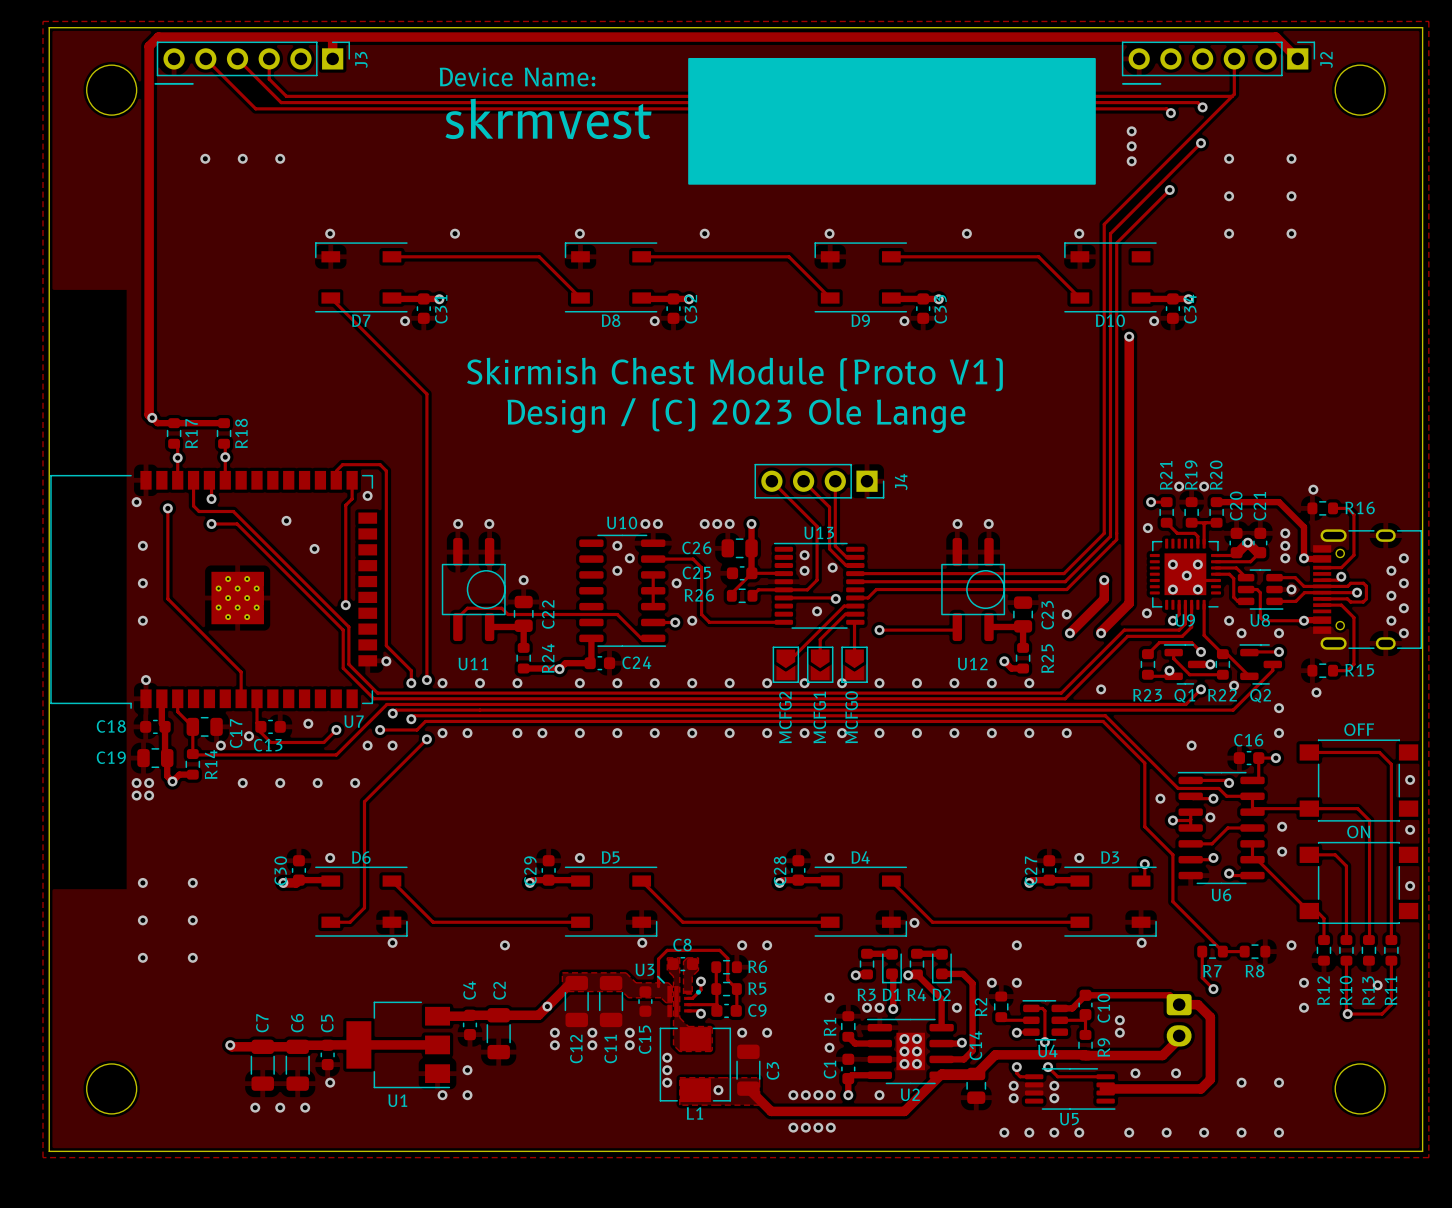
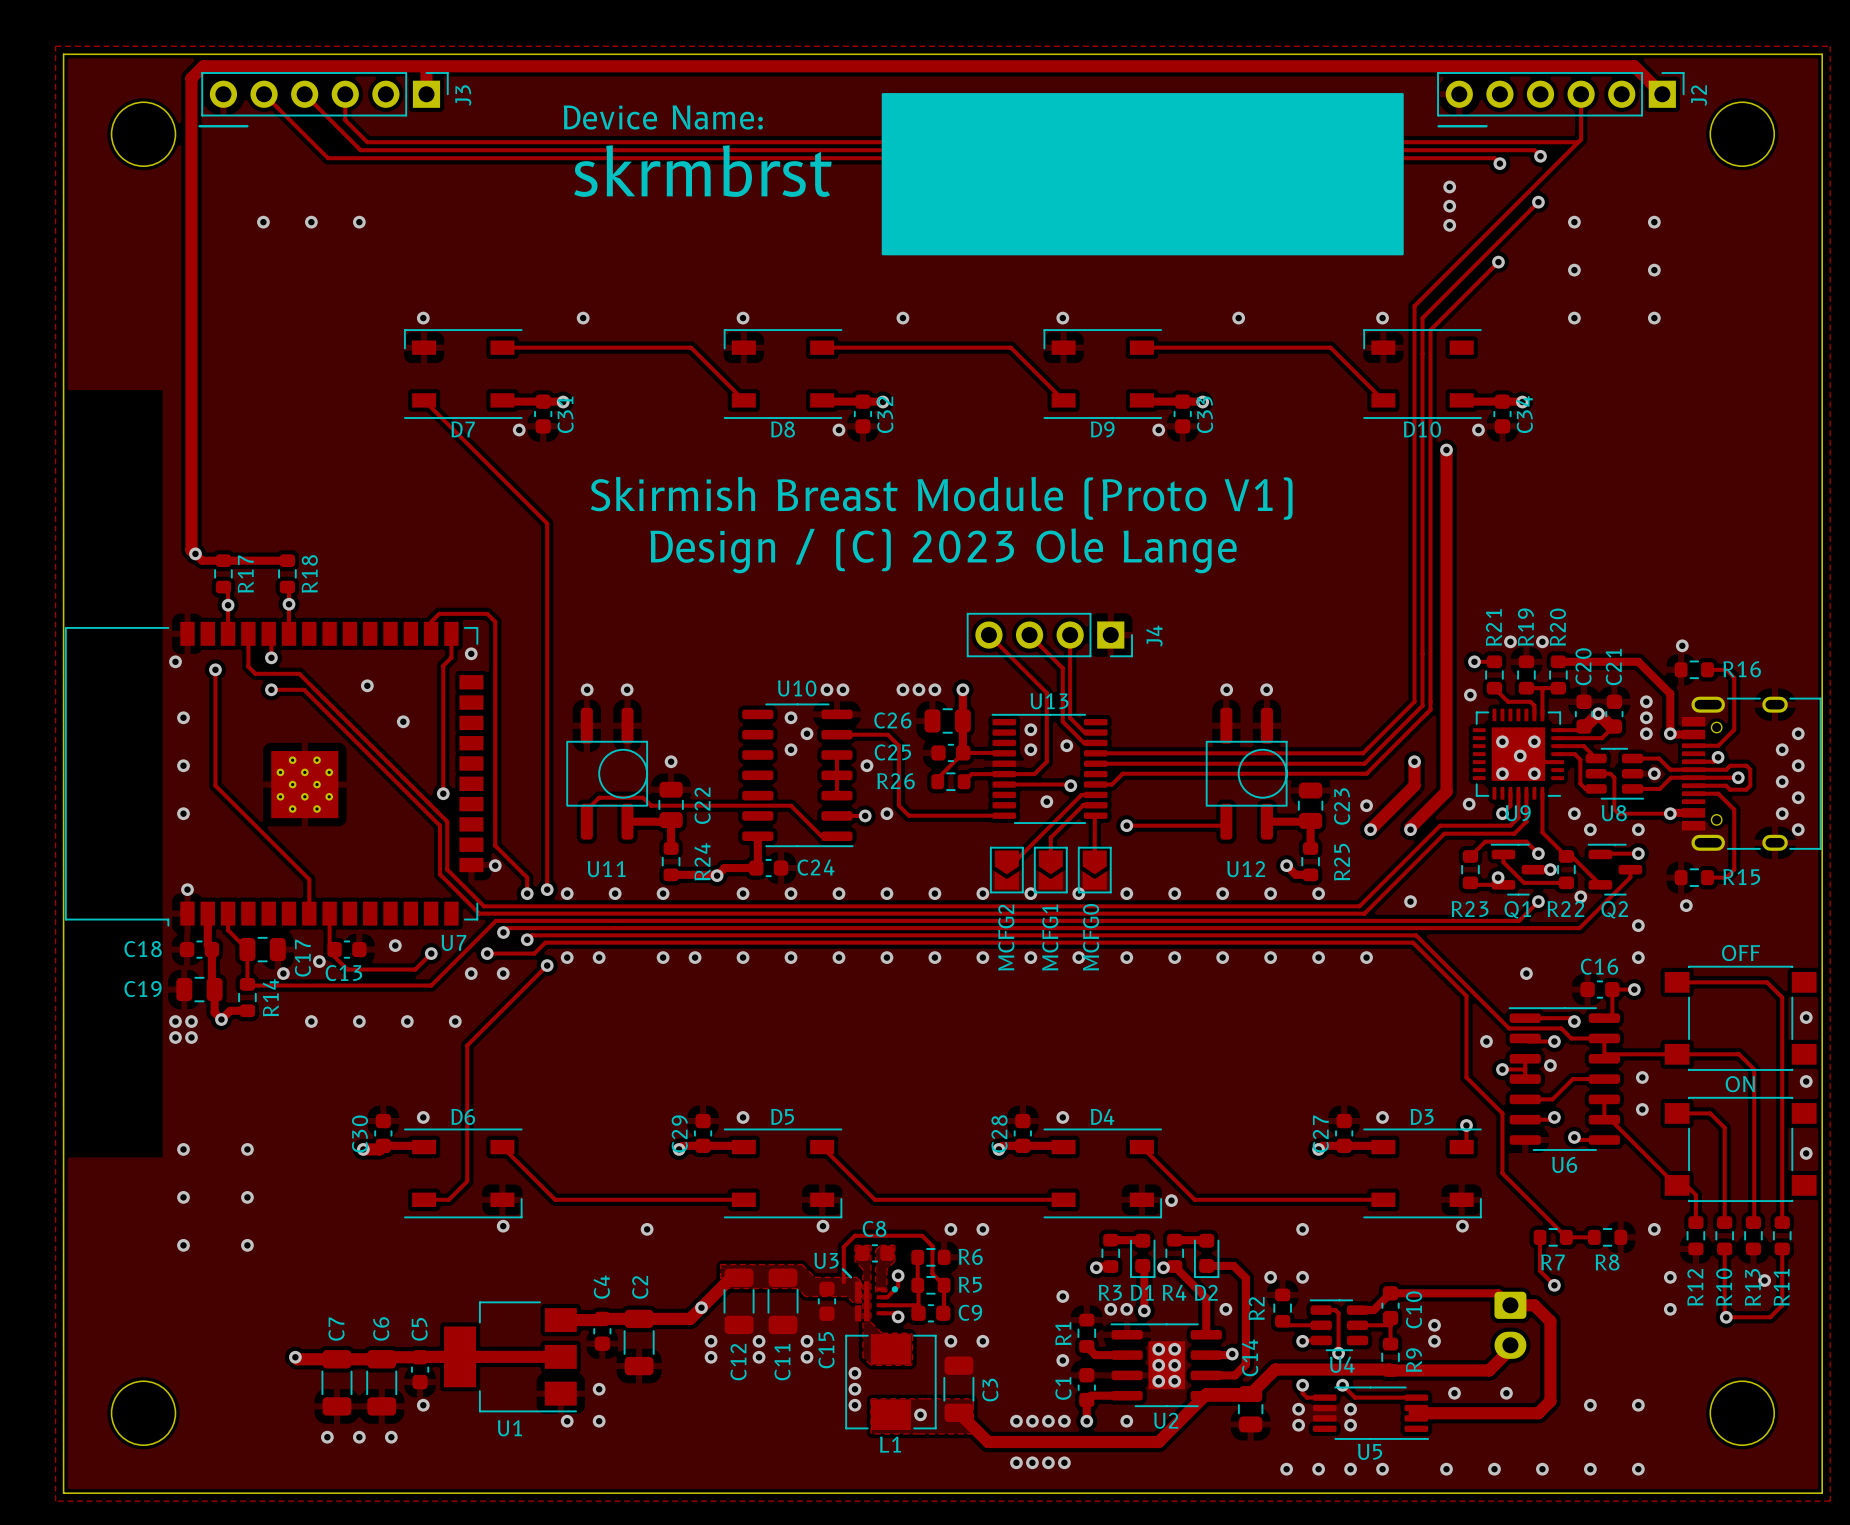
text: skrmvest (548, 118) -> skrmbrst (702, 171)
text: Skirmish Chest Module (Proto V1) (734, 374) -> Skirmish Breast Module (Proto V1) (941, 498)

